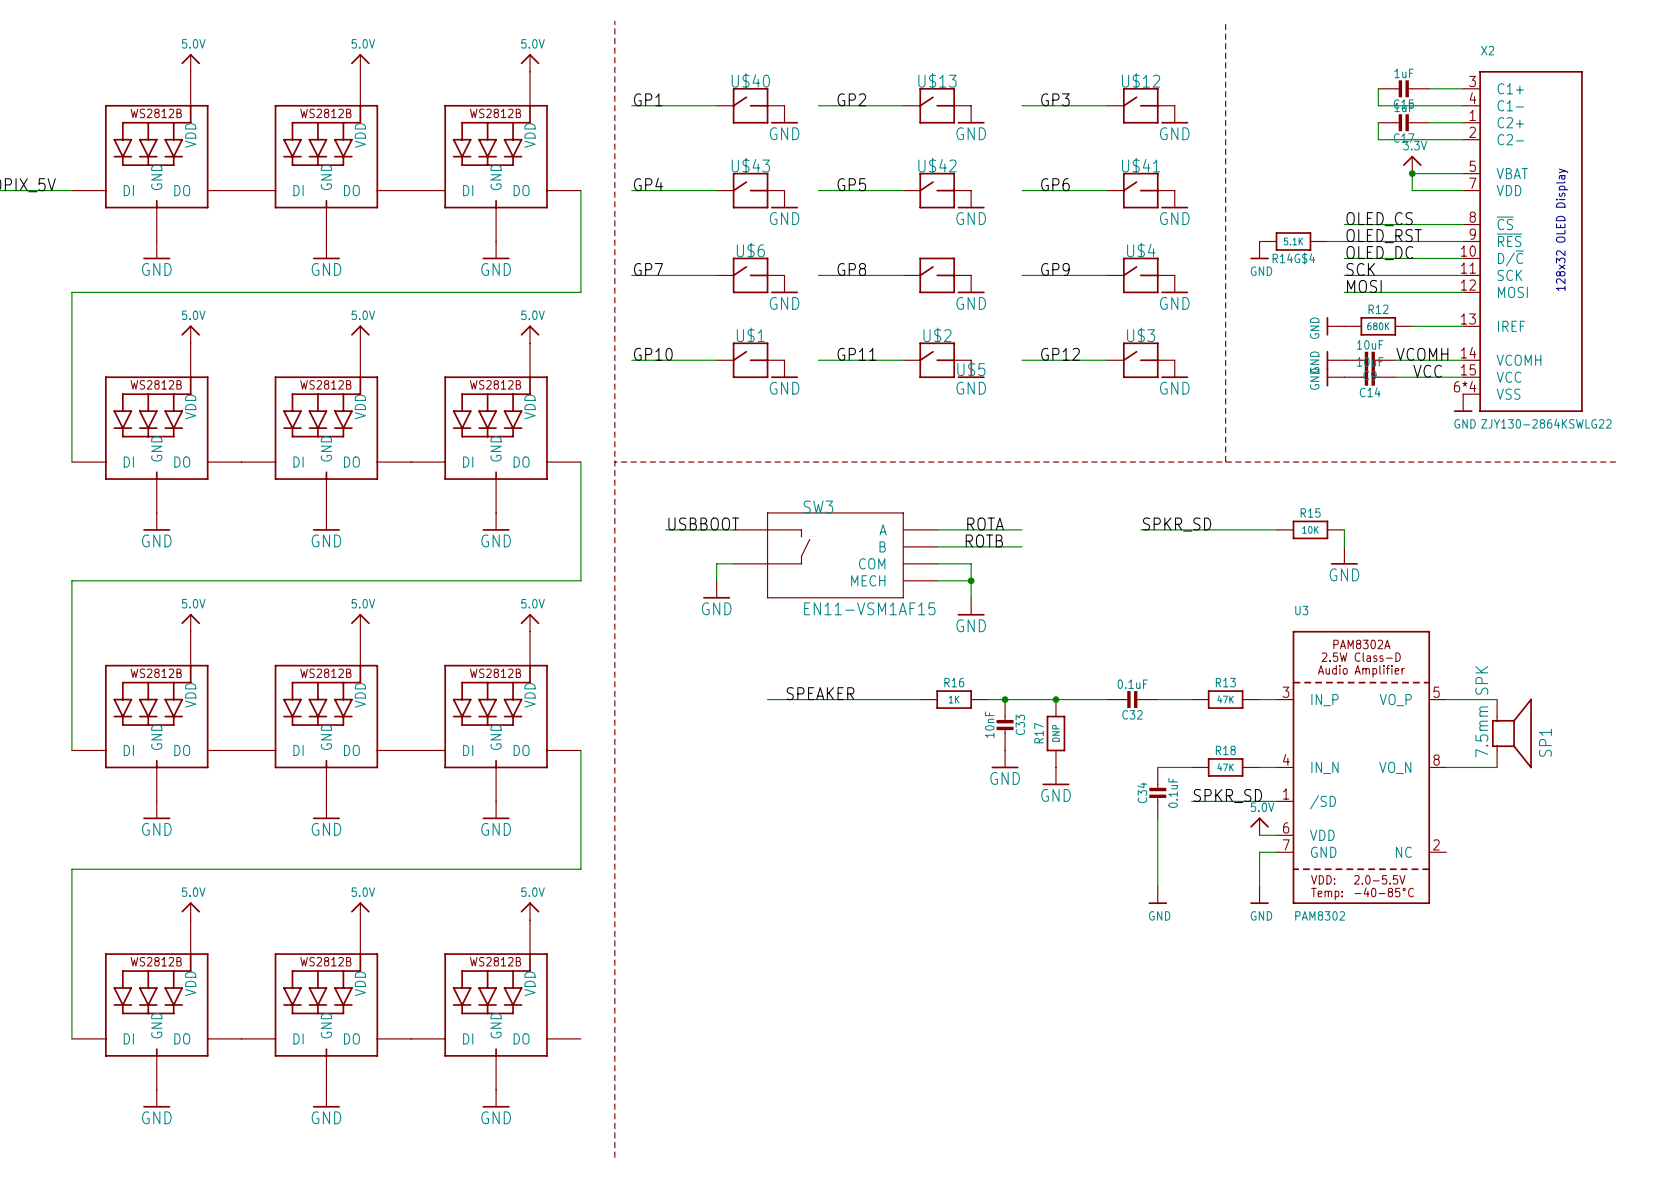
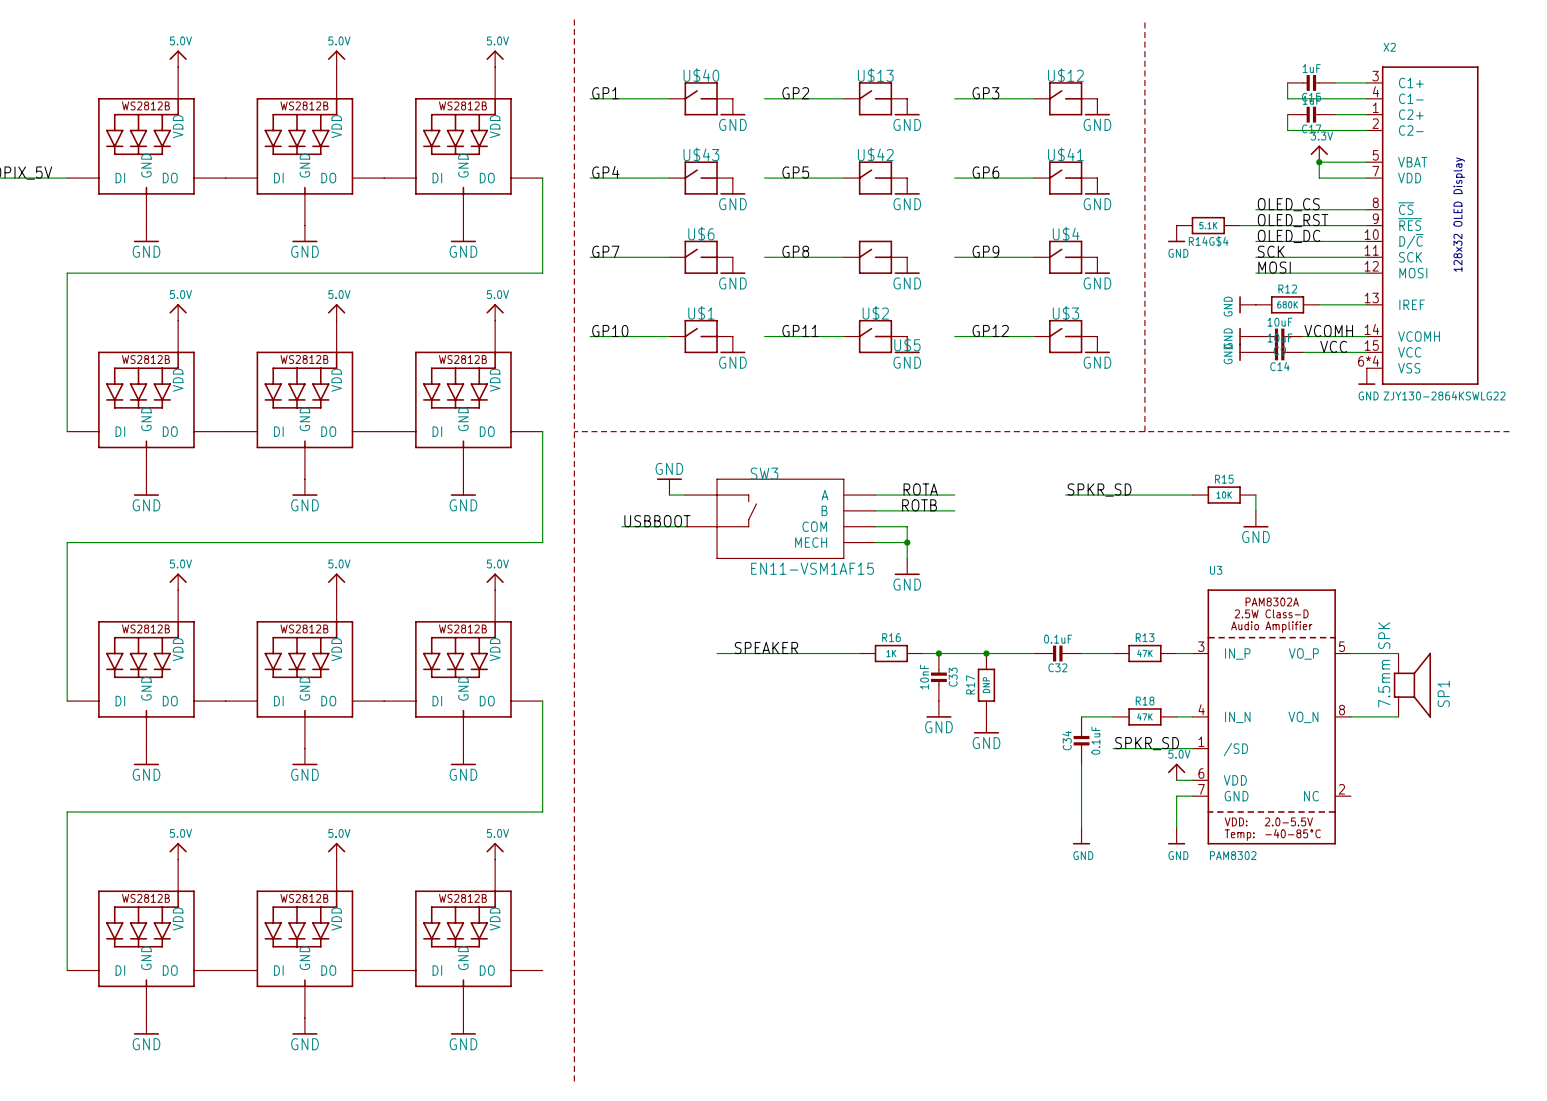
label position: USBBOOT (703, 523) -> USBBOOT (657, 521)
wire: (665, 529) (716, 529) -> none
wire: (716, 563) (716, 580) -> (669, 526) (621, 526)
power symbol position: GND (716, 589) -> GND (669, 486)
power symbol rotation: 0° (716, 597) -> 180° (669, 479)

